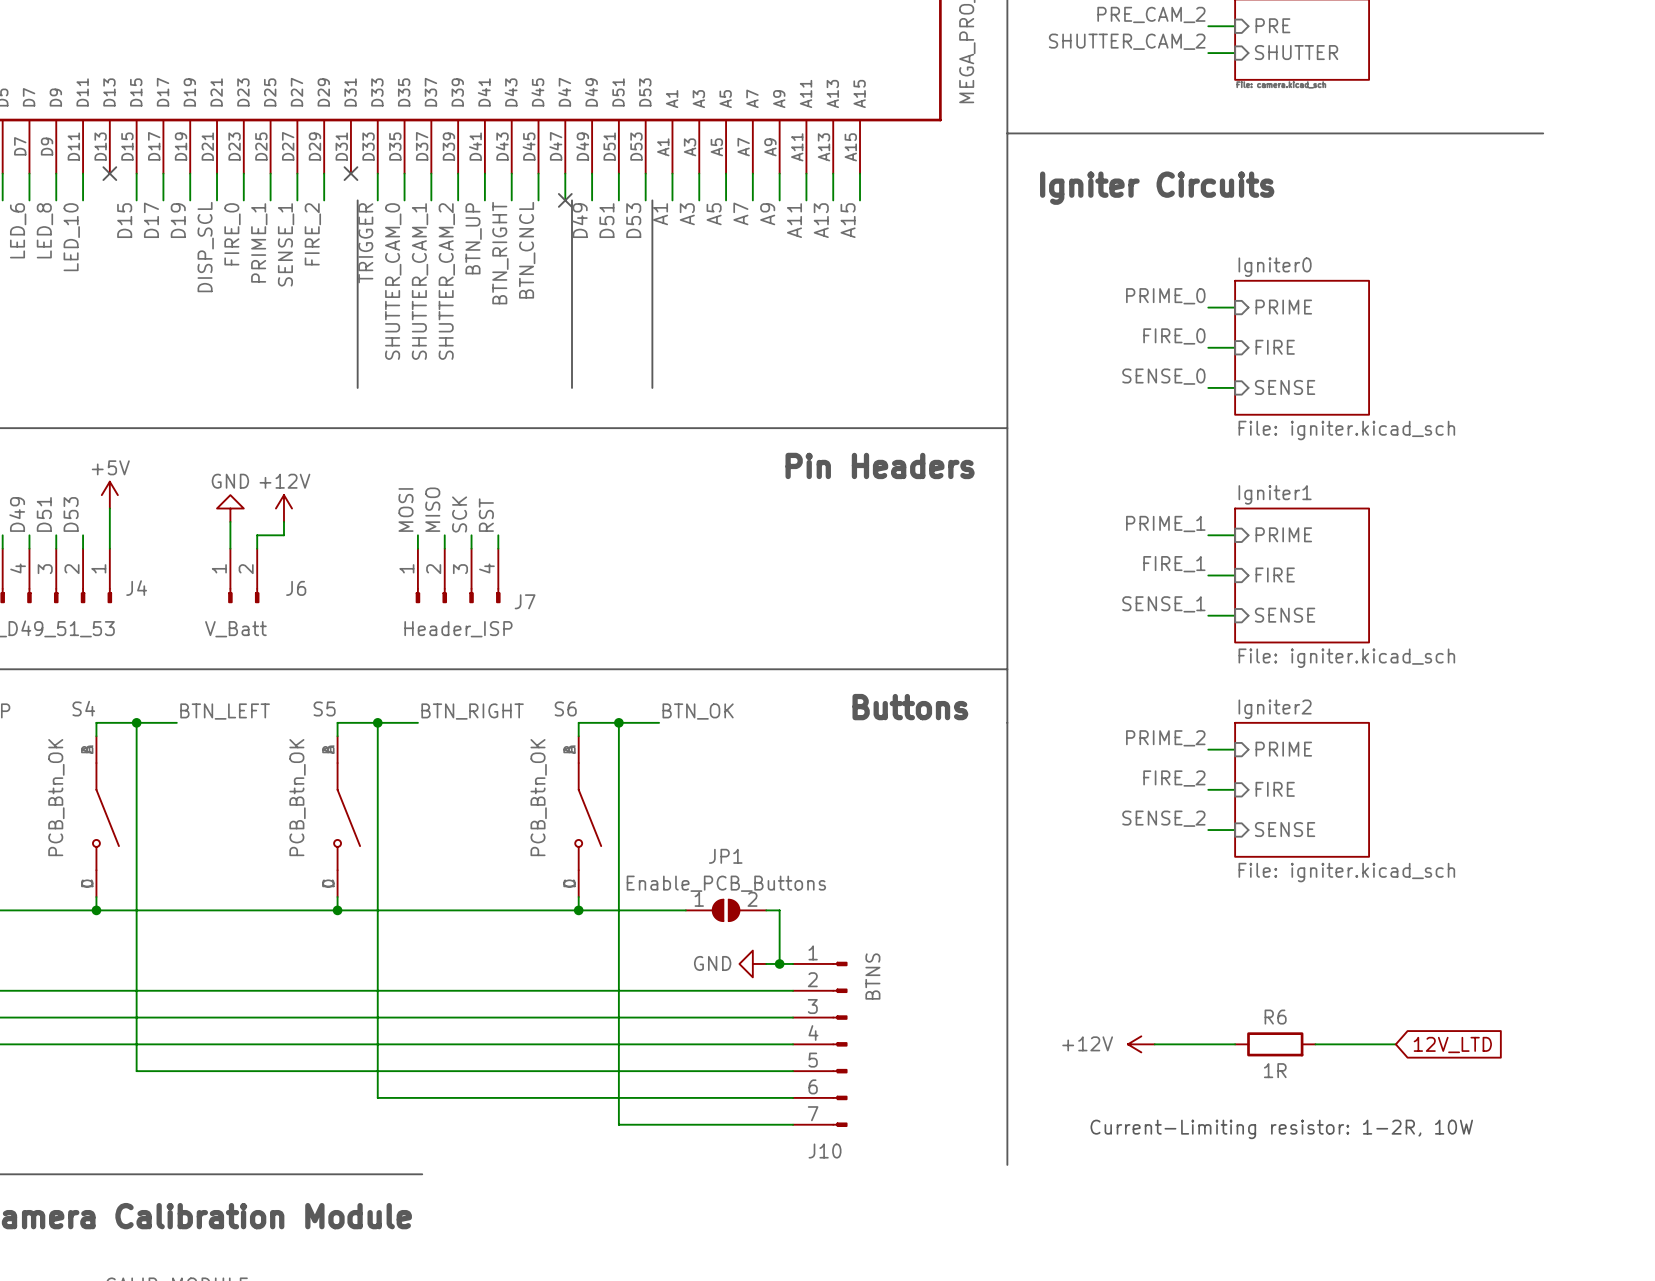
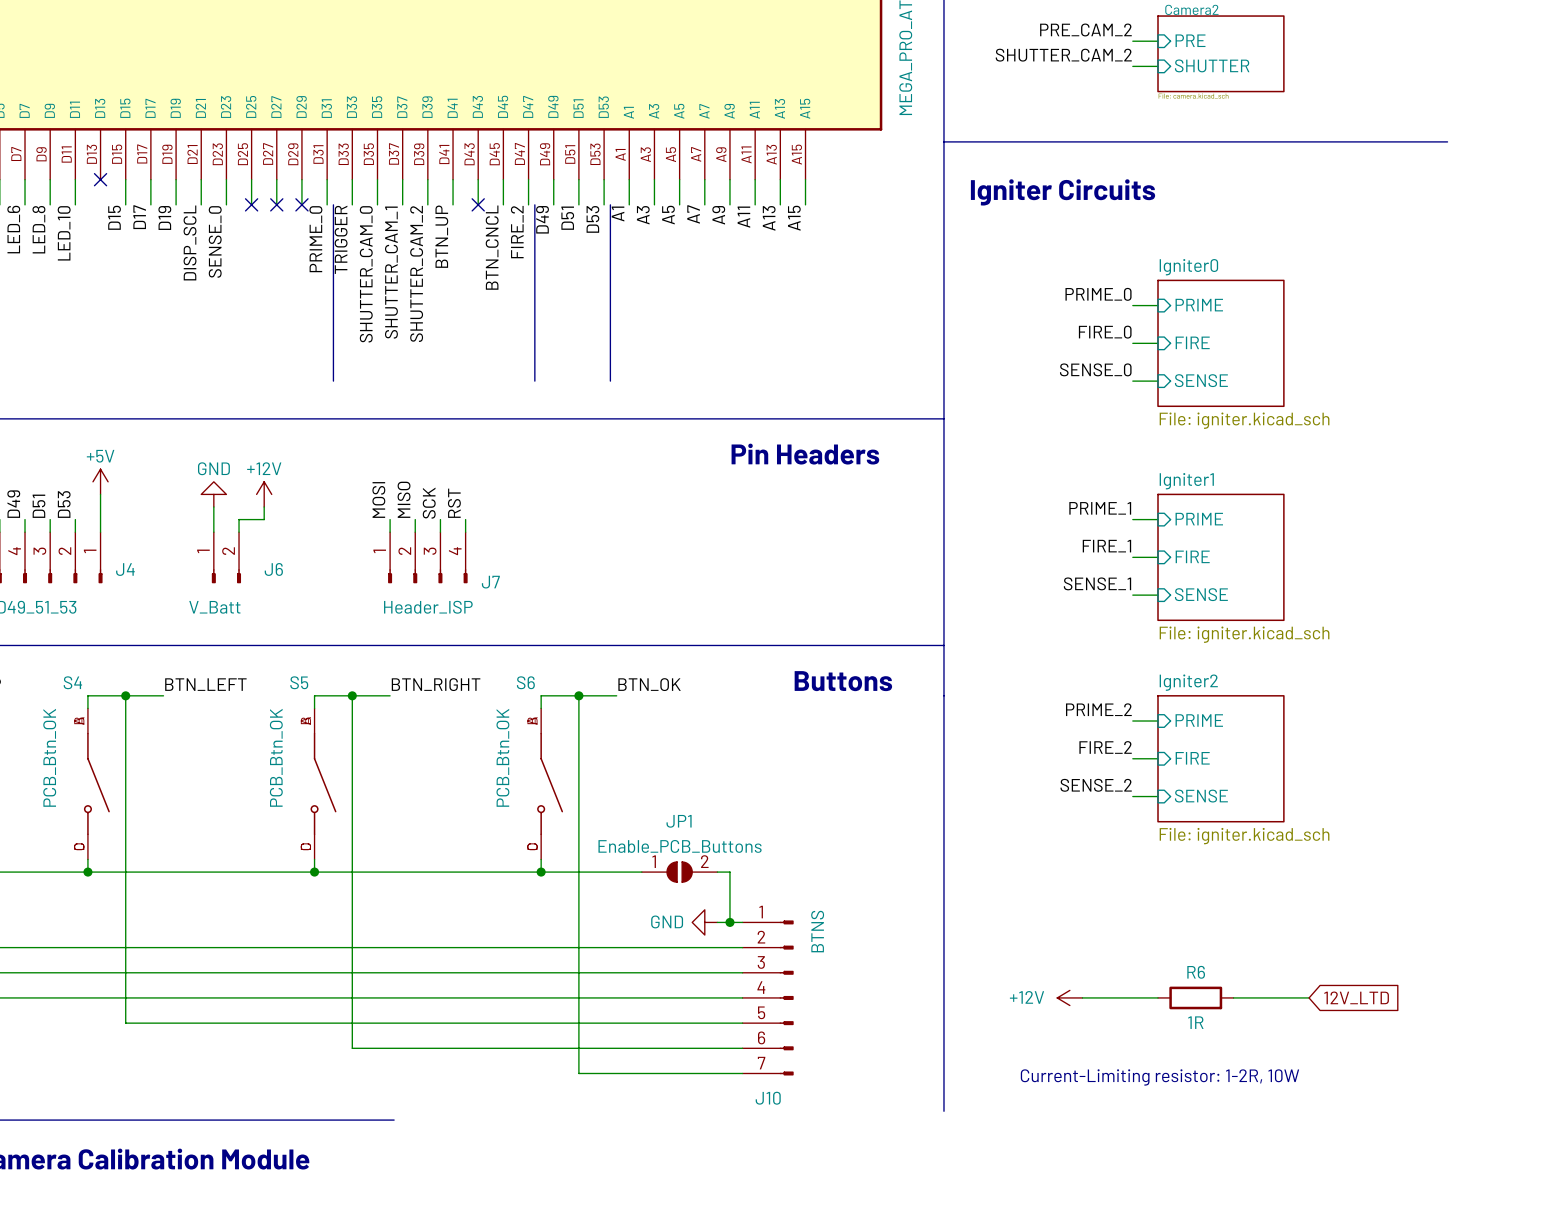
wire: none -> (327, 179) (327, 204)
no-connect mark: (350, 173) -> none
no-connect mark: none -> (251, 204)
no-connect mark: none -> (276, 204)
no-connect mark: none -> (301, 204)
no-connect mark position: (565, 200) -> (478, 204)
label: FIRE_0 (232, 234) -> SENSE_0 (215, 241)
label position: FIRE_2 (312, 234) -> FIRE_2 (517, 232)
label: PRIME_1 (259, 242) -> none
label: none -> PRIME_0 (315, 239)
label: SENSE_1 (286, 244) -> none
label: BTN_RIGHT (500, 253) -> none

